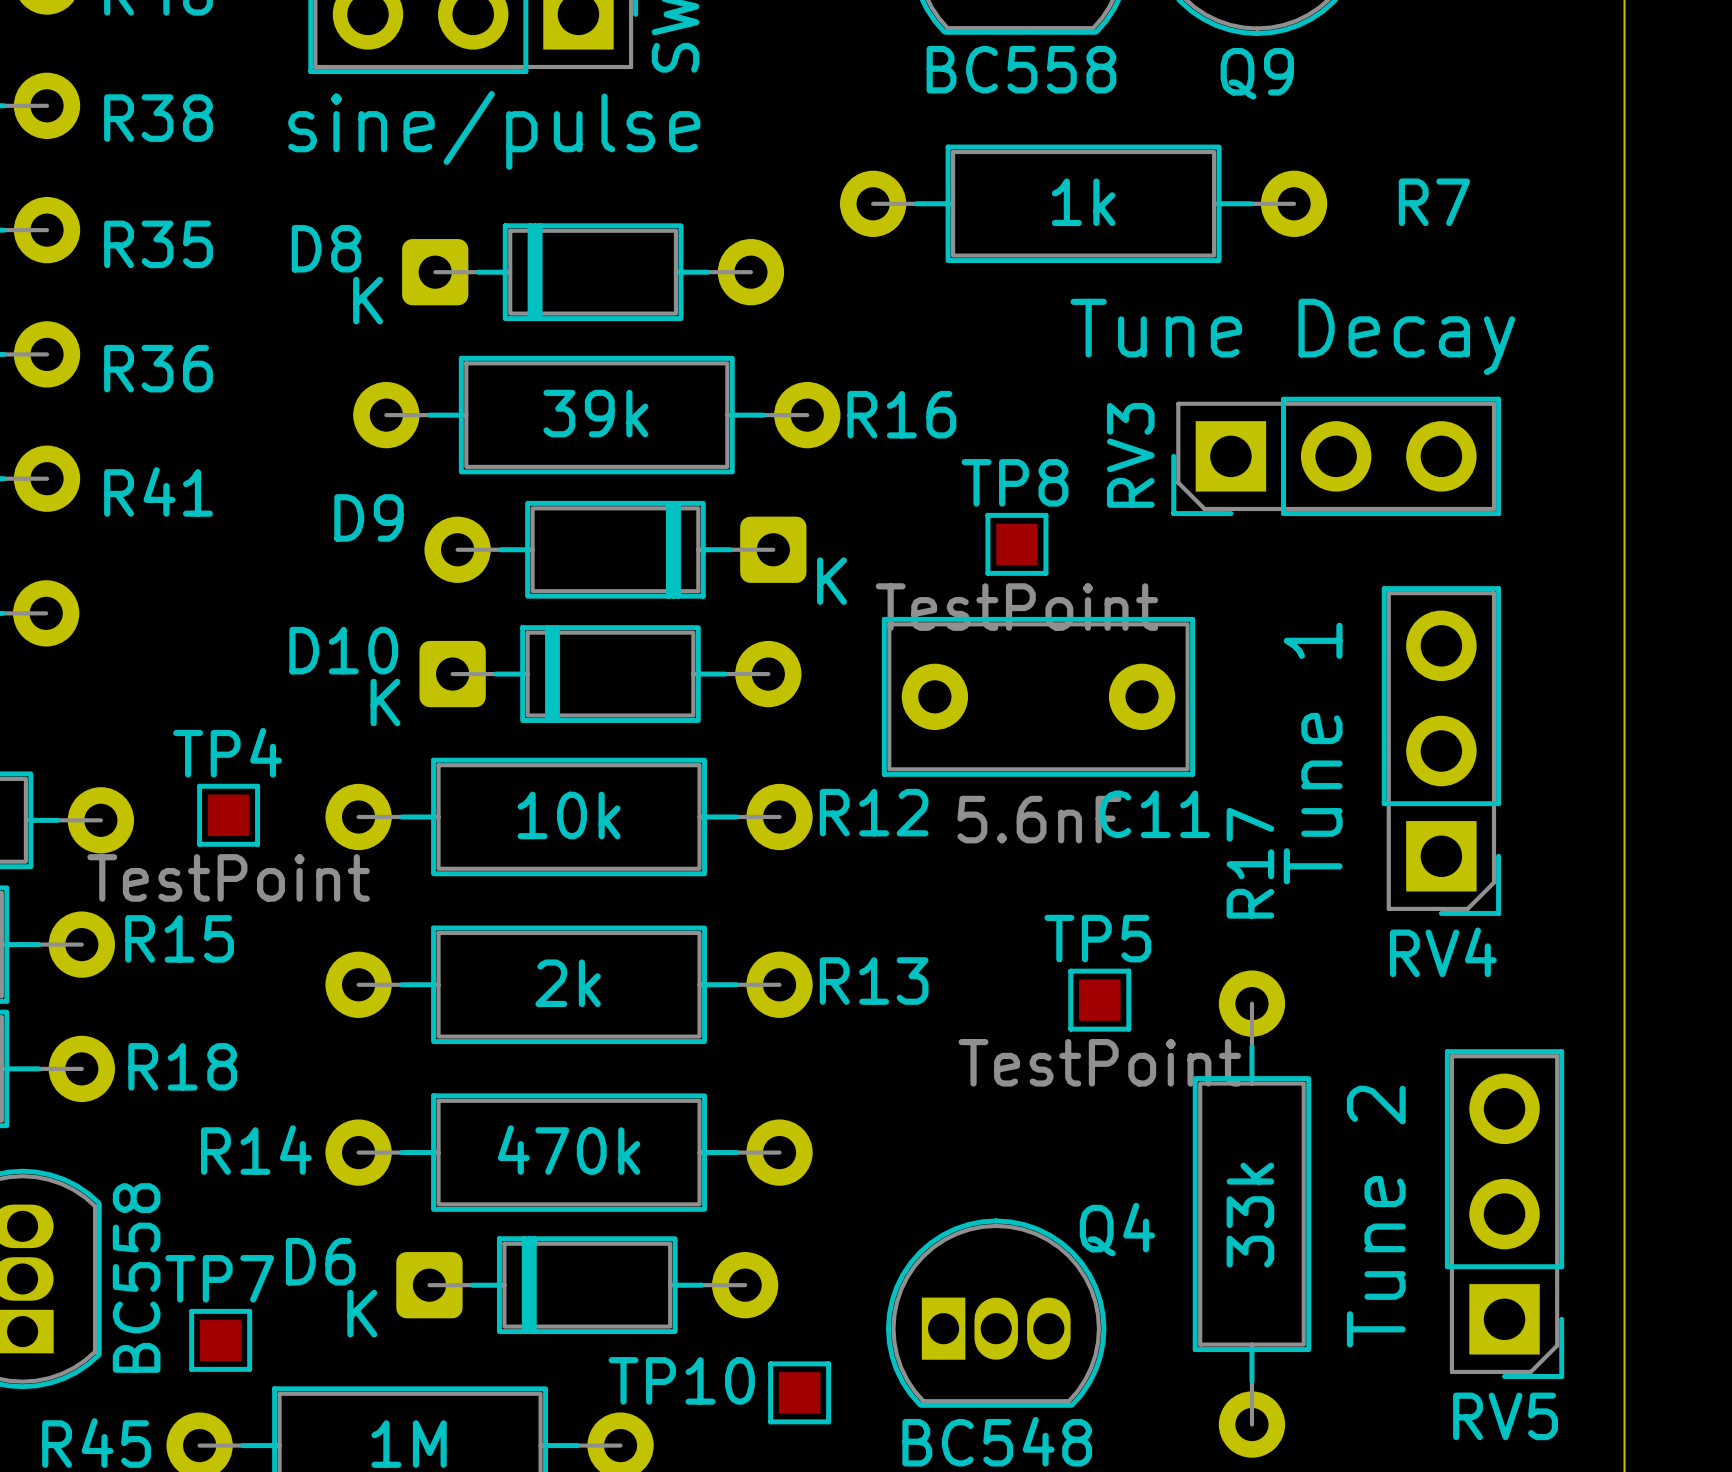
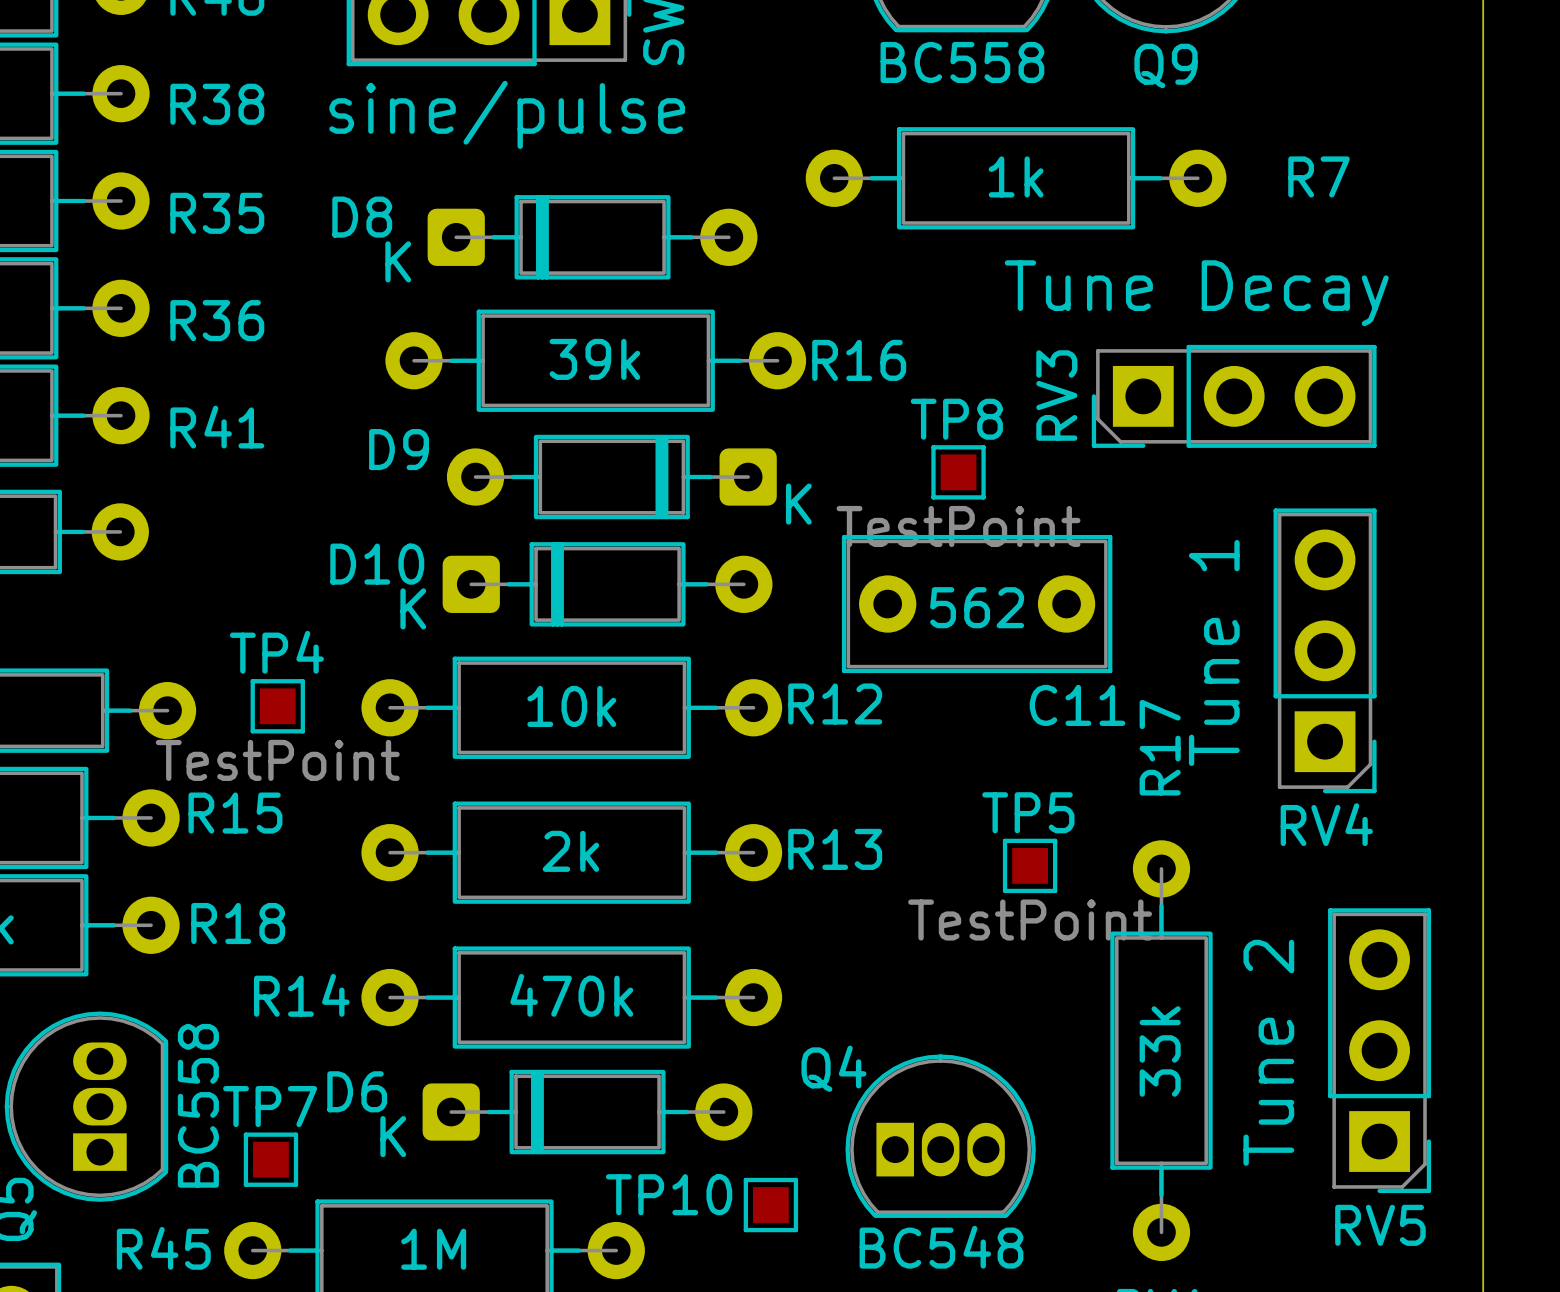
C11 value: 5.6nF (1039, 819) -> 562 (977, 607)
Q4 name position: Q4 (1117, 1229) -> Q4 (833, 1068)

